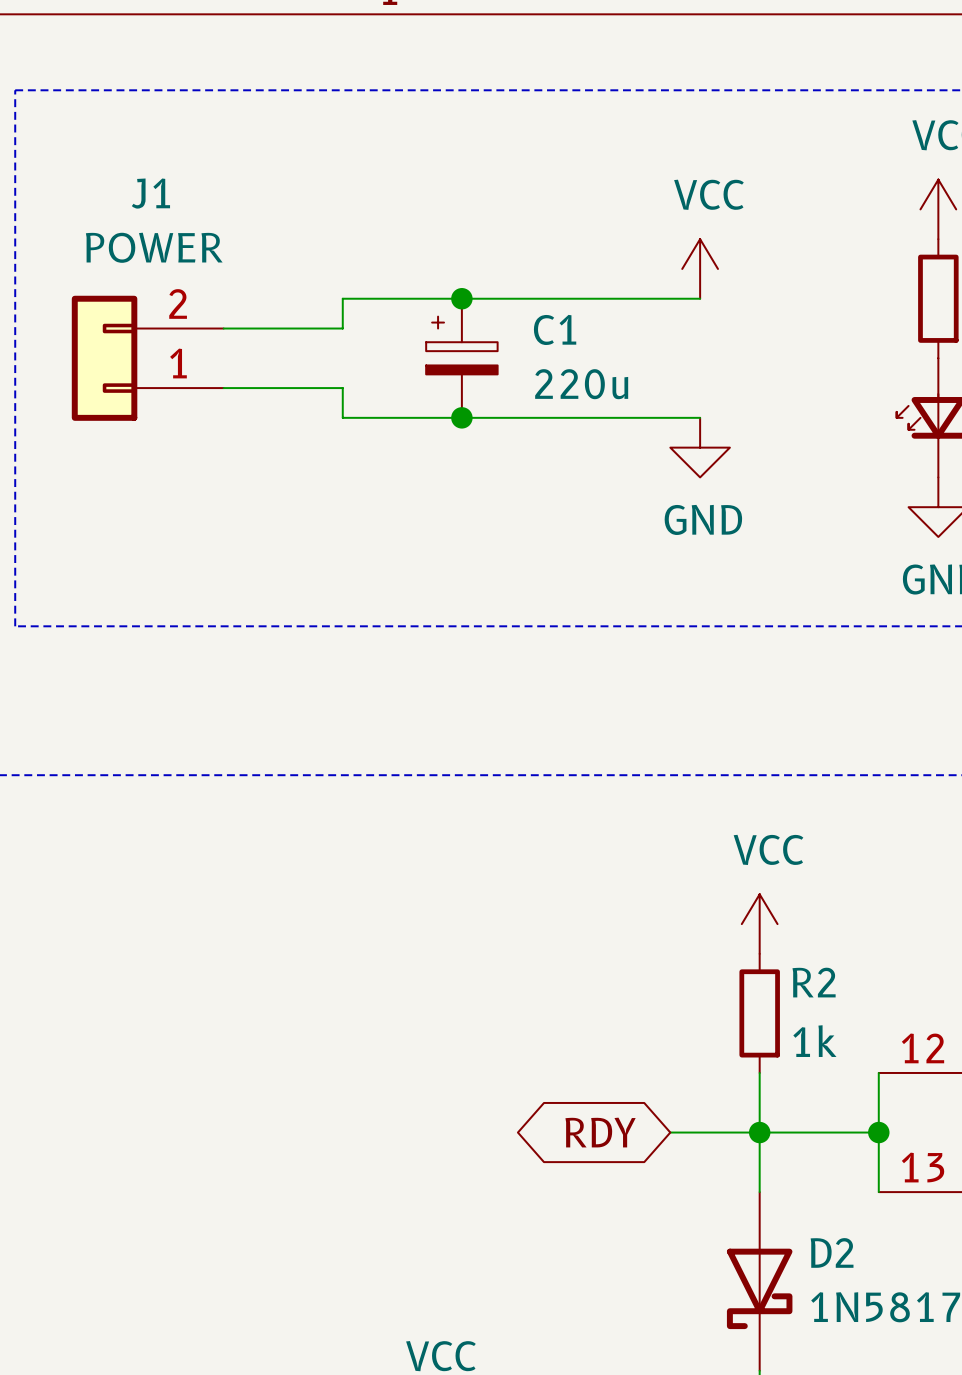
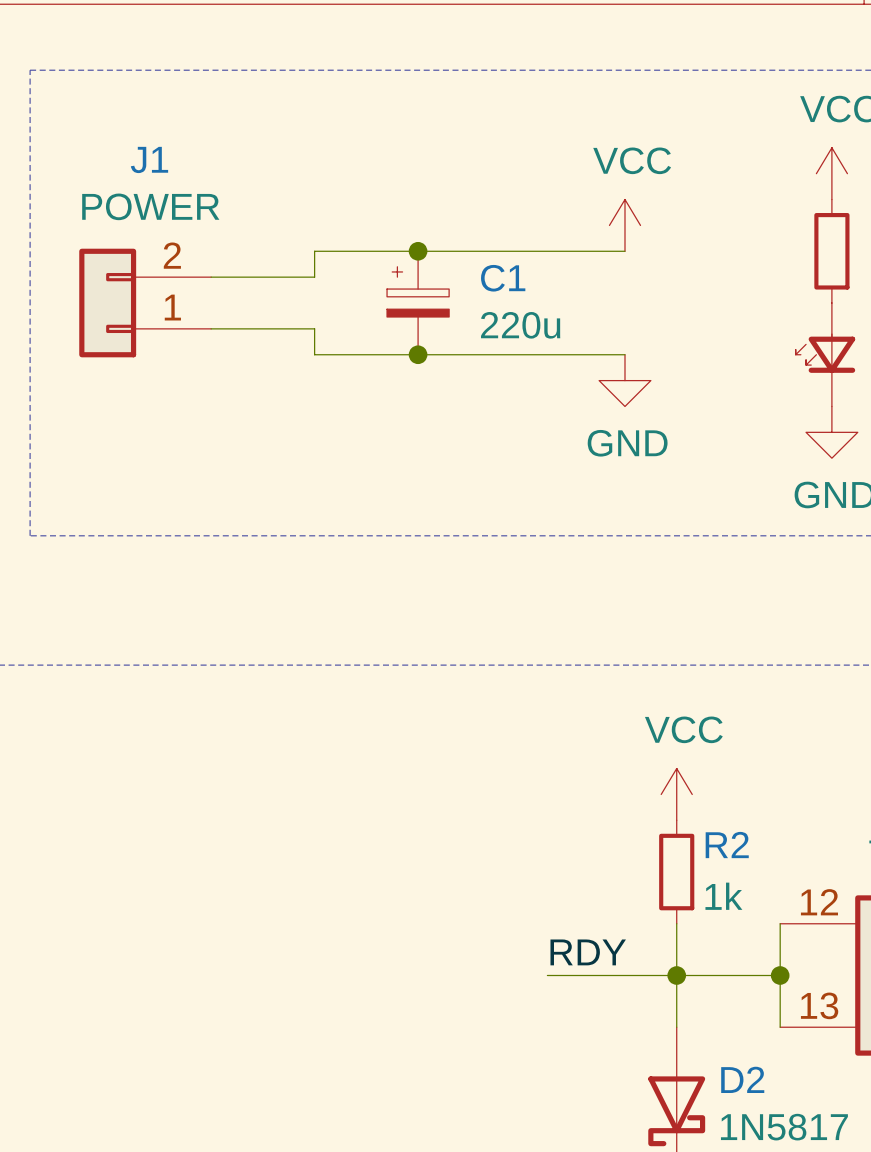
label: none -> RDY (588, 952)
global label: RDY (600, 1132) -> none
wire: none -> (547, 975) (599, 975)

